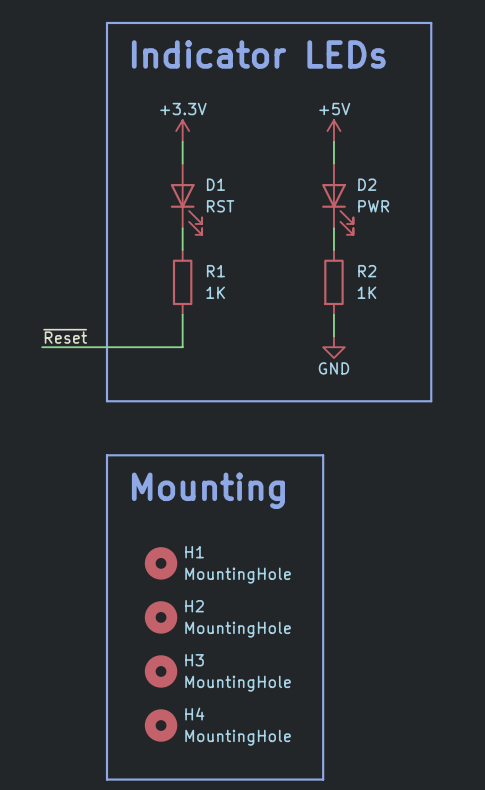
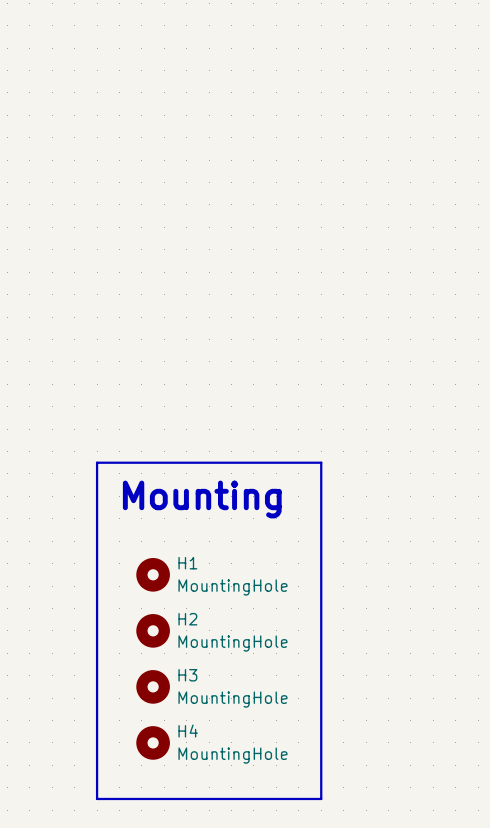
line: (106, 22) (431, 22) (431, 401) (106, 401) (106, 22) -> none
text: Indicator LEDs (258, 54) -> none
power symbol: +3.3V (182, 131) -> none
power symbol: +5V (333, 131) -> none
wire: (182, 141) (182, 163) -> none
wire: (333, 141) (333, 163) -> none
D1: RST (186, 199) -> none
D2: PWR (337, 199) -> none
wire: (182, 228) (182, 249) -> none
wire: (333, 228) (333, 249) -> none
R1: 1K (182, 282) -> none
R2: 1K (333, 282) -> none
wire: (182, 314) (182, 347) (42, 347) -> none
wire: (333, 314) (333, 336) -> none
label: ~{Reset} (65, 336) -> none
power symbol: GND (333, 347) -> none

